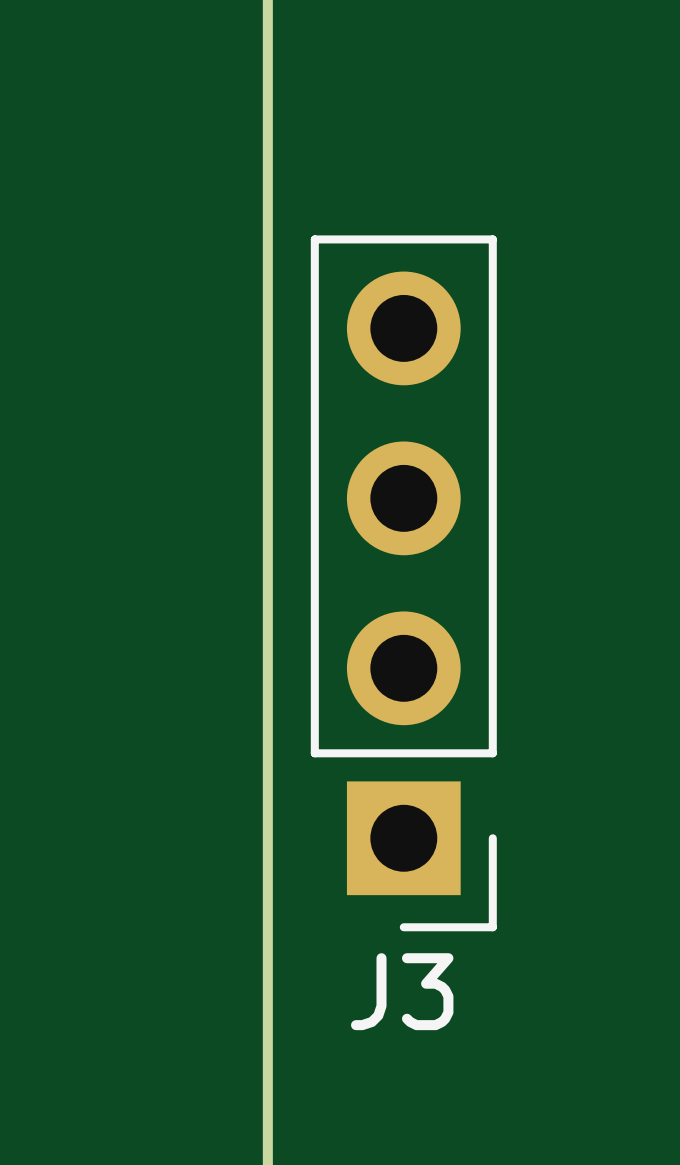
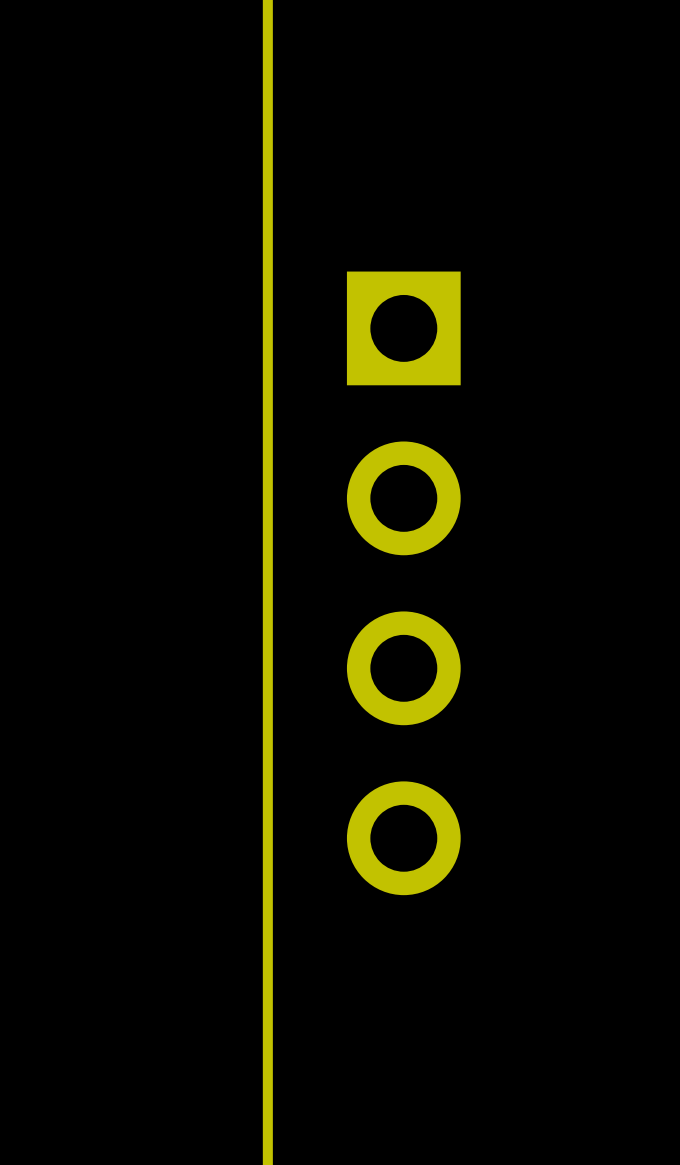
J3 side: bottom (403, 583) -> top (403, 583)

